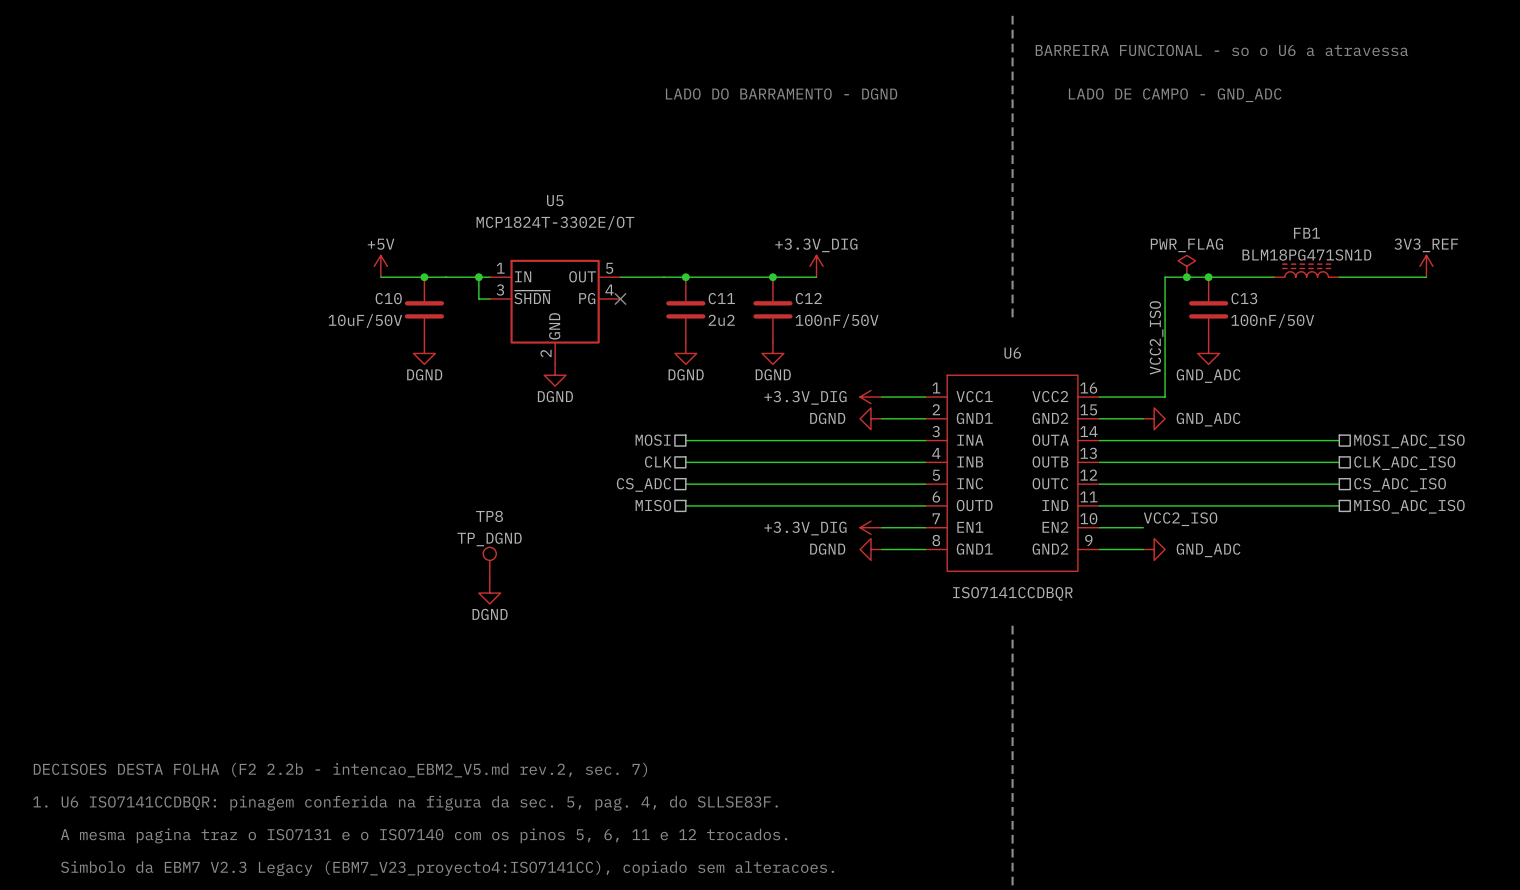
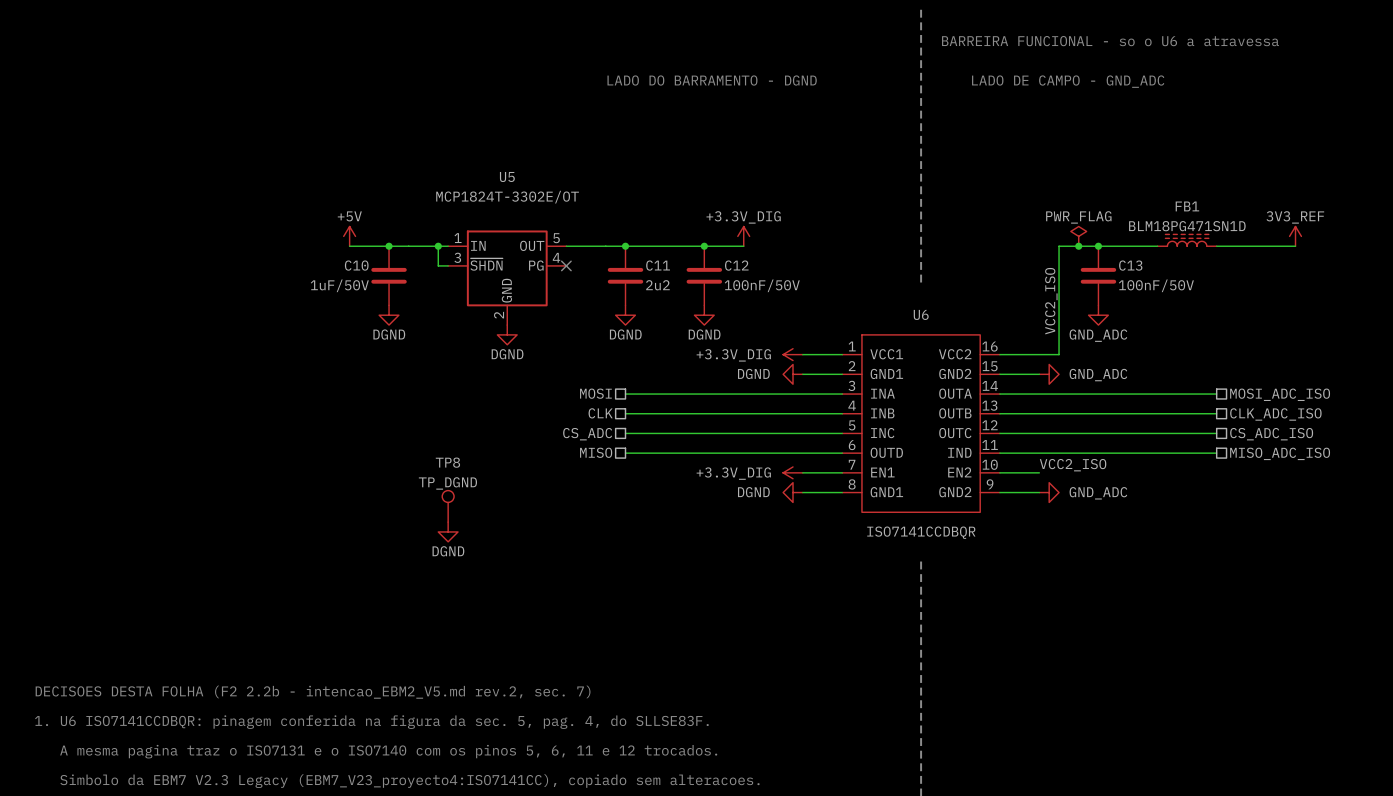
C10 value: 10uF/50V (365, 320) -> 1uF/50V (339, 285)

